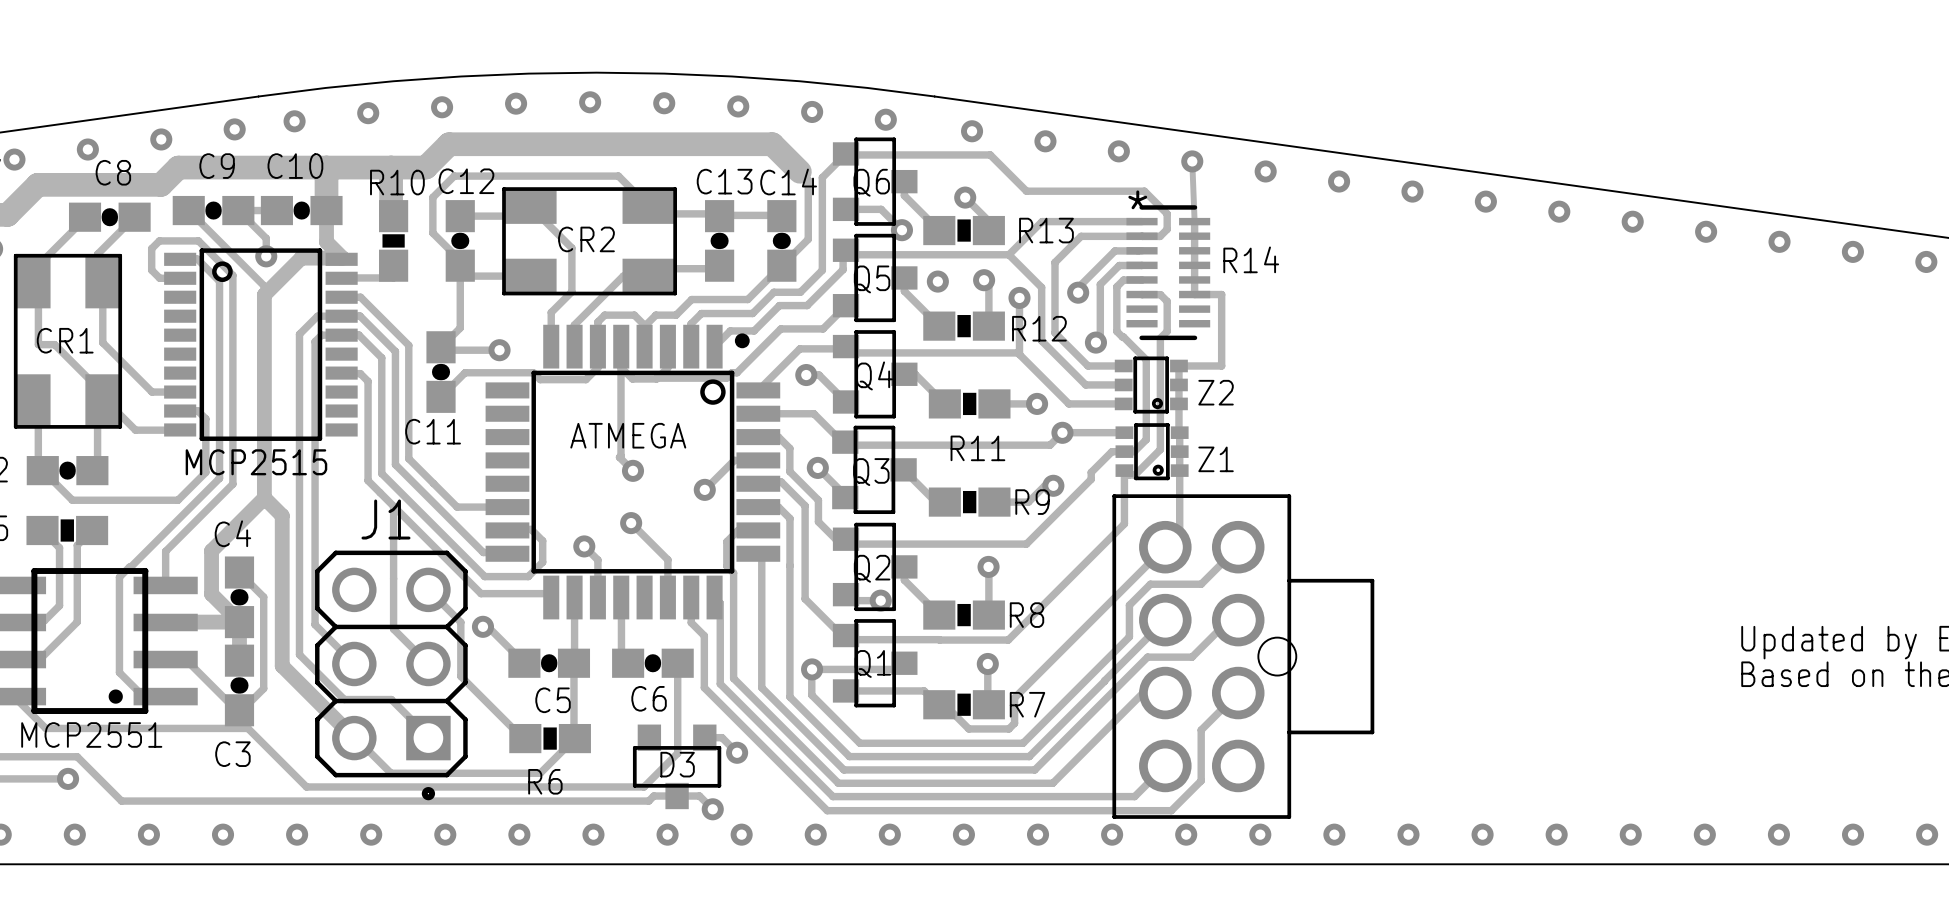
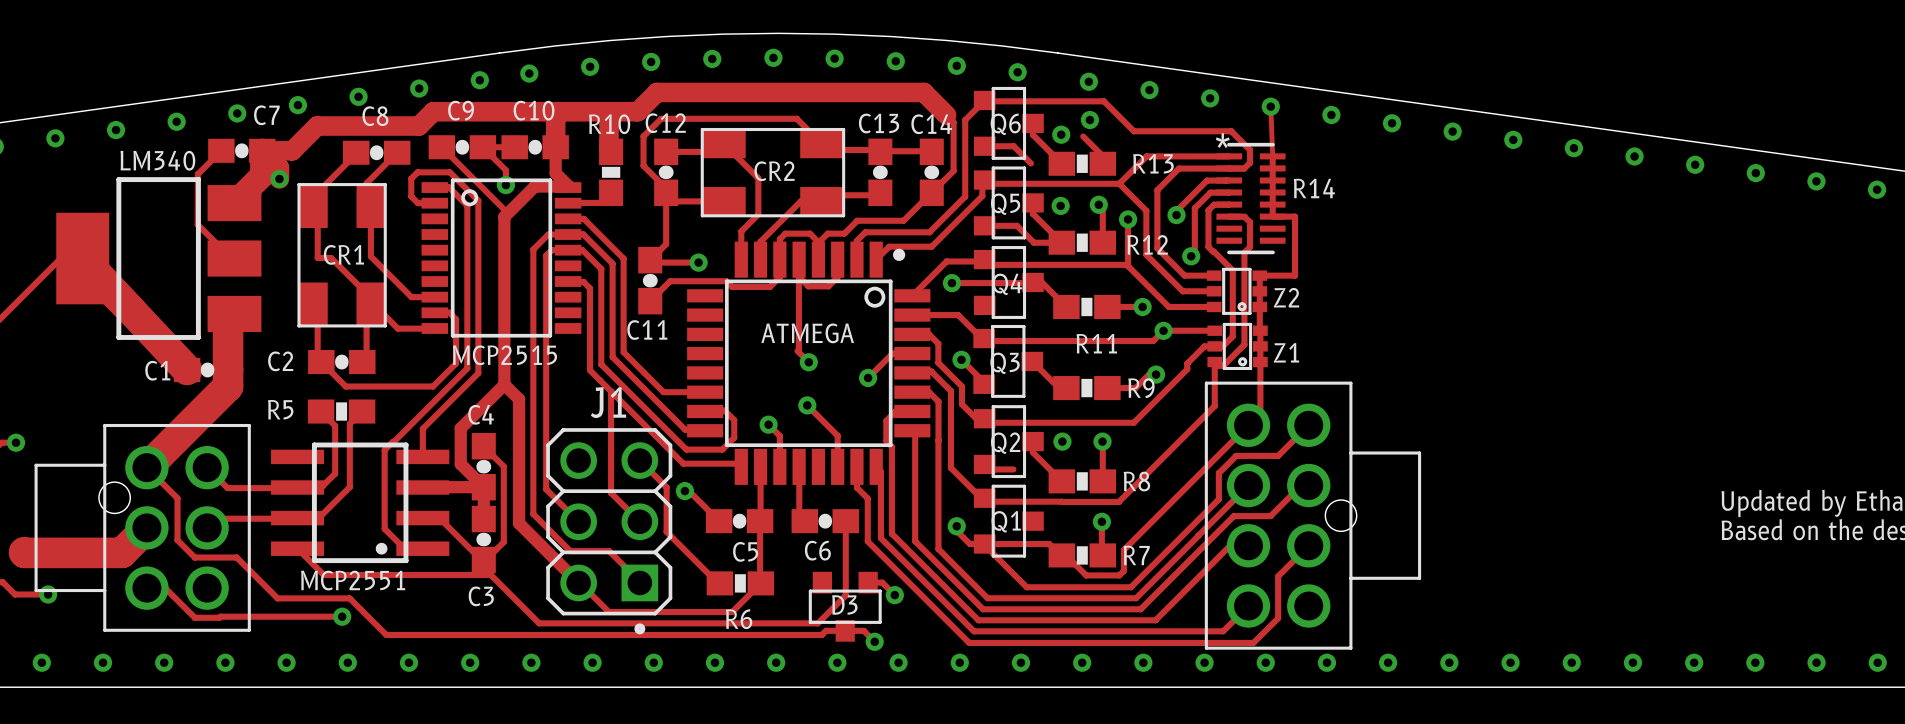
via: none -> (1061, 134)
via position: (965, 197) -> (1089, 120)
via: (901, 230) -> none
track: (800, 292) (773, 292) (752, 313) -> (947, 214) (929, 232) (907, 232)
track: (807, 305) (779, 305) (754, 330) -> (952, 225) (931, 246) (908, 246)
track: (846, 305) (823, 328) (780, 328) (737, 372) (732, 372) (726, 378) (657, 378) -> (984, 225) (1017, 225) (1033, 242) (1061, 242)
track: (819, 375) (846, 402) -> (962, 283) (1032, 282)
via position: (880, 600) -> (1062, 441)
track: (903, 664) (898, 669) (812, 669) -> none
track: (811, 669) (811, 695) (859, 743) (896, 743) -> (956, 526) (956, 530) (969, 544) (984, 544) (1026, 587)

